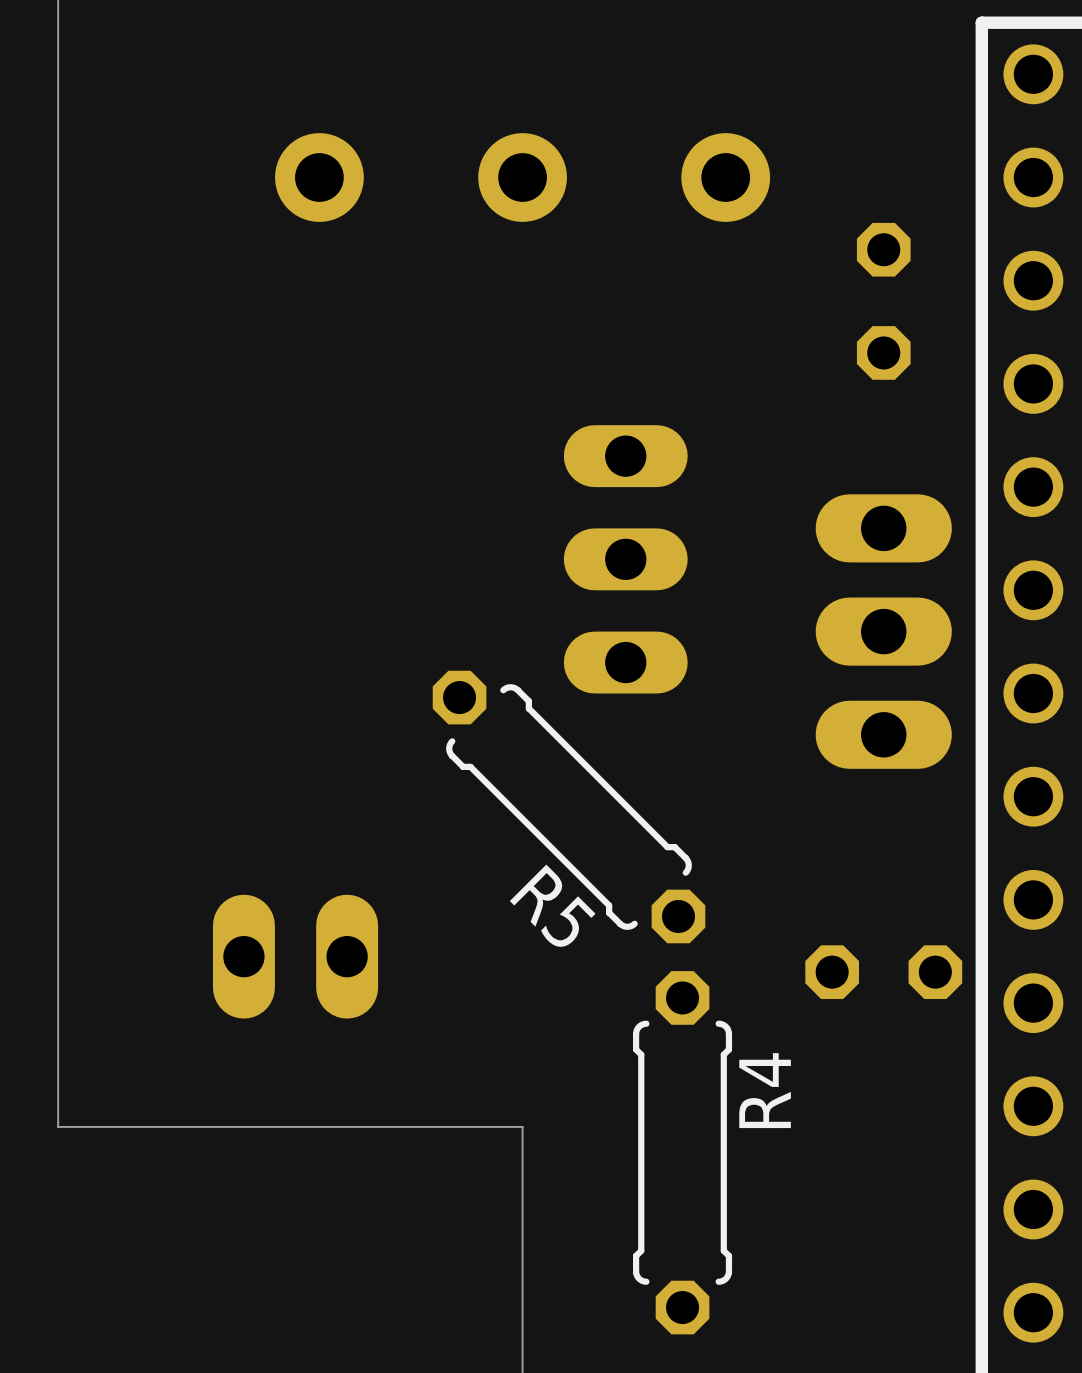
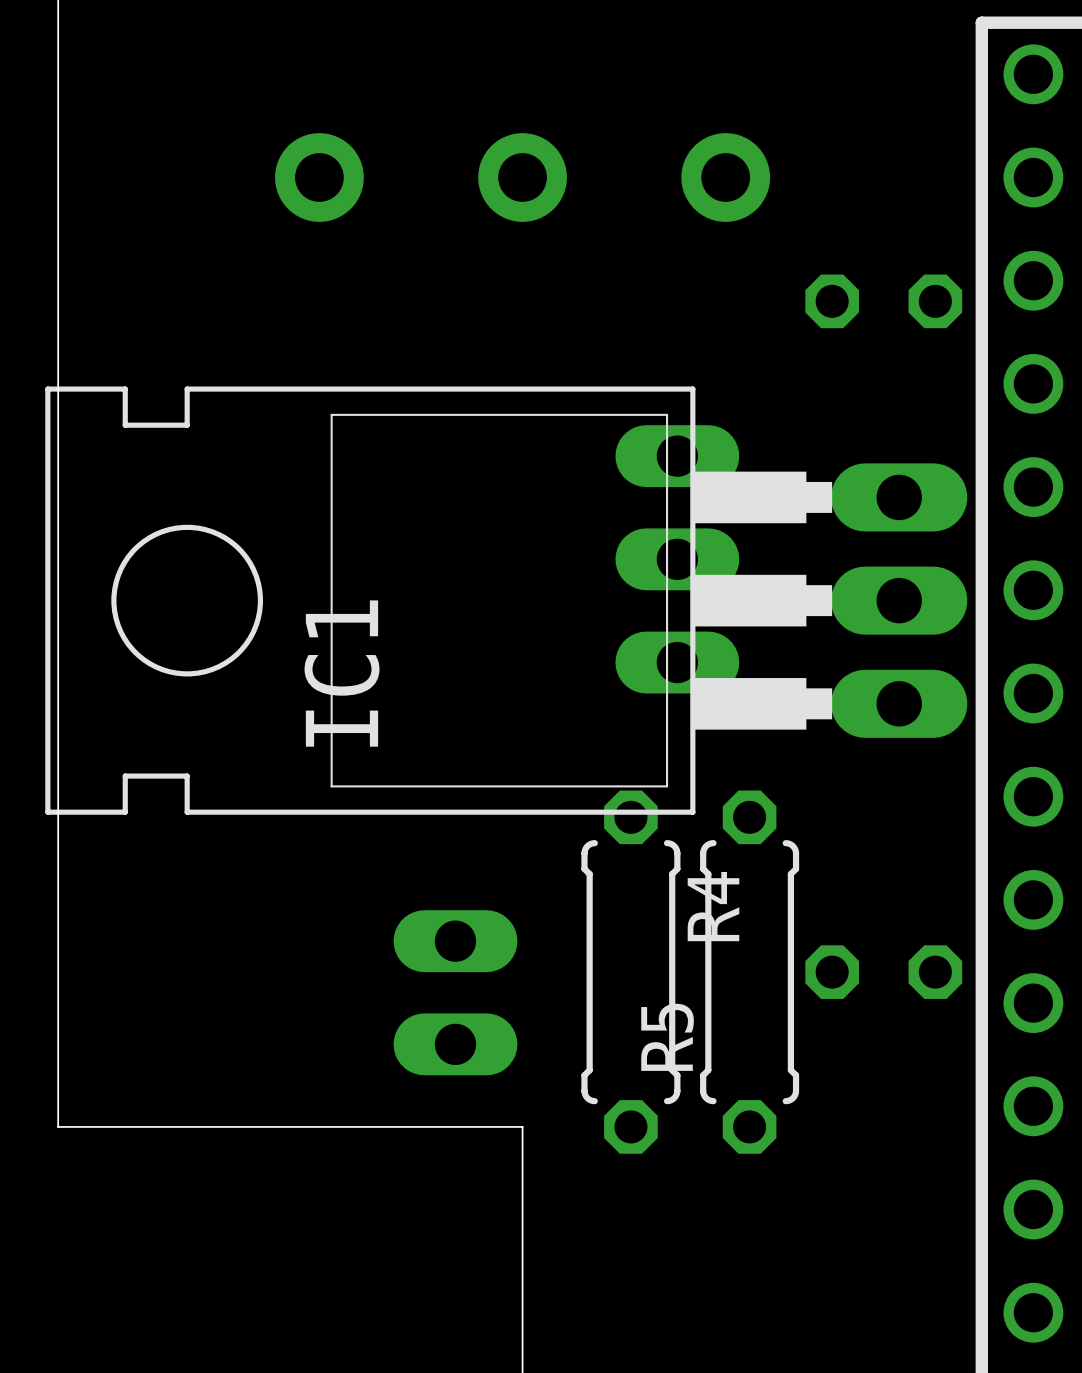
part rotation: 0° (883, 301) -> 90° clockwise (883, 301)
part position: (625, 559) -> (677, 559)
IC1 side: top (883, 631) -> bottom (506, 600)
R5 rotation: 0° (569, 807) -> 45° clockwise (749, 972)
R5 position: (569, 807) -> (749, 972)
part rotation: 0° (295, 956) -> 90° clockwise (455, 992)
part position: (295, 956) -> (455, 992)
R4 position: (682, 1152) -> (630, 972)

